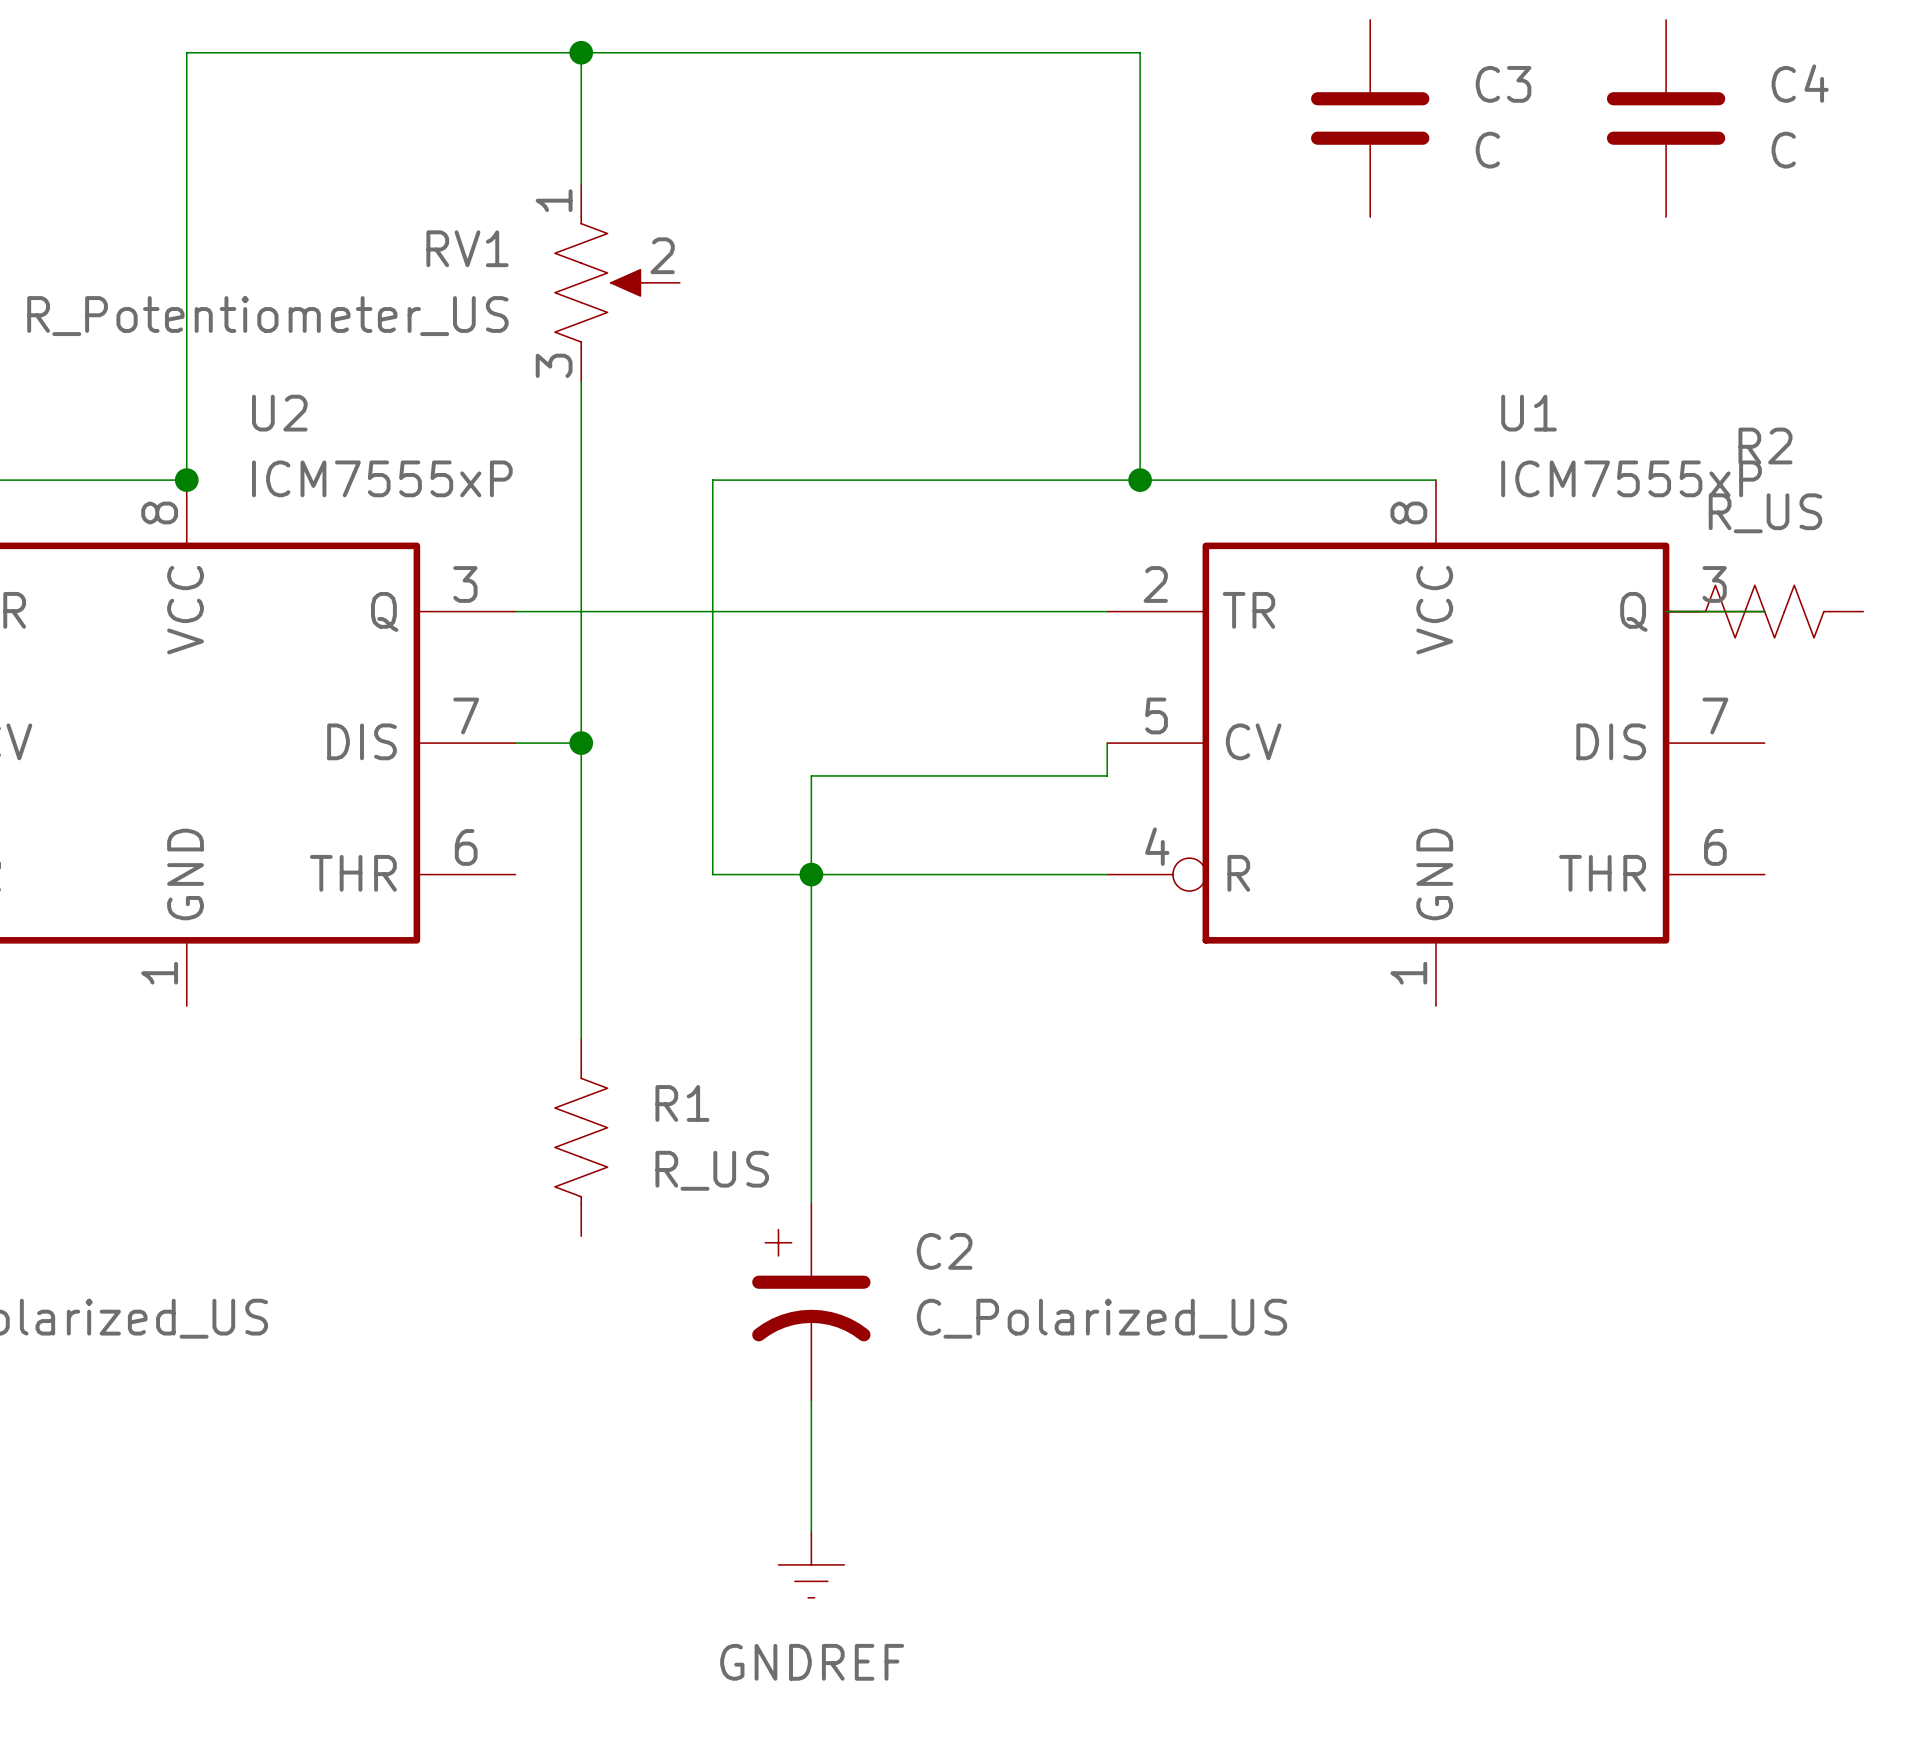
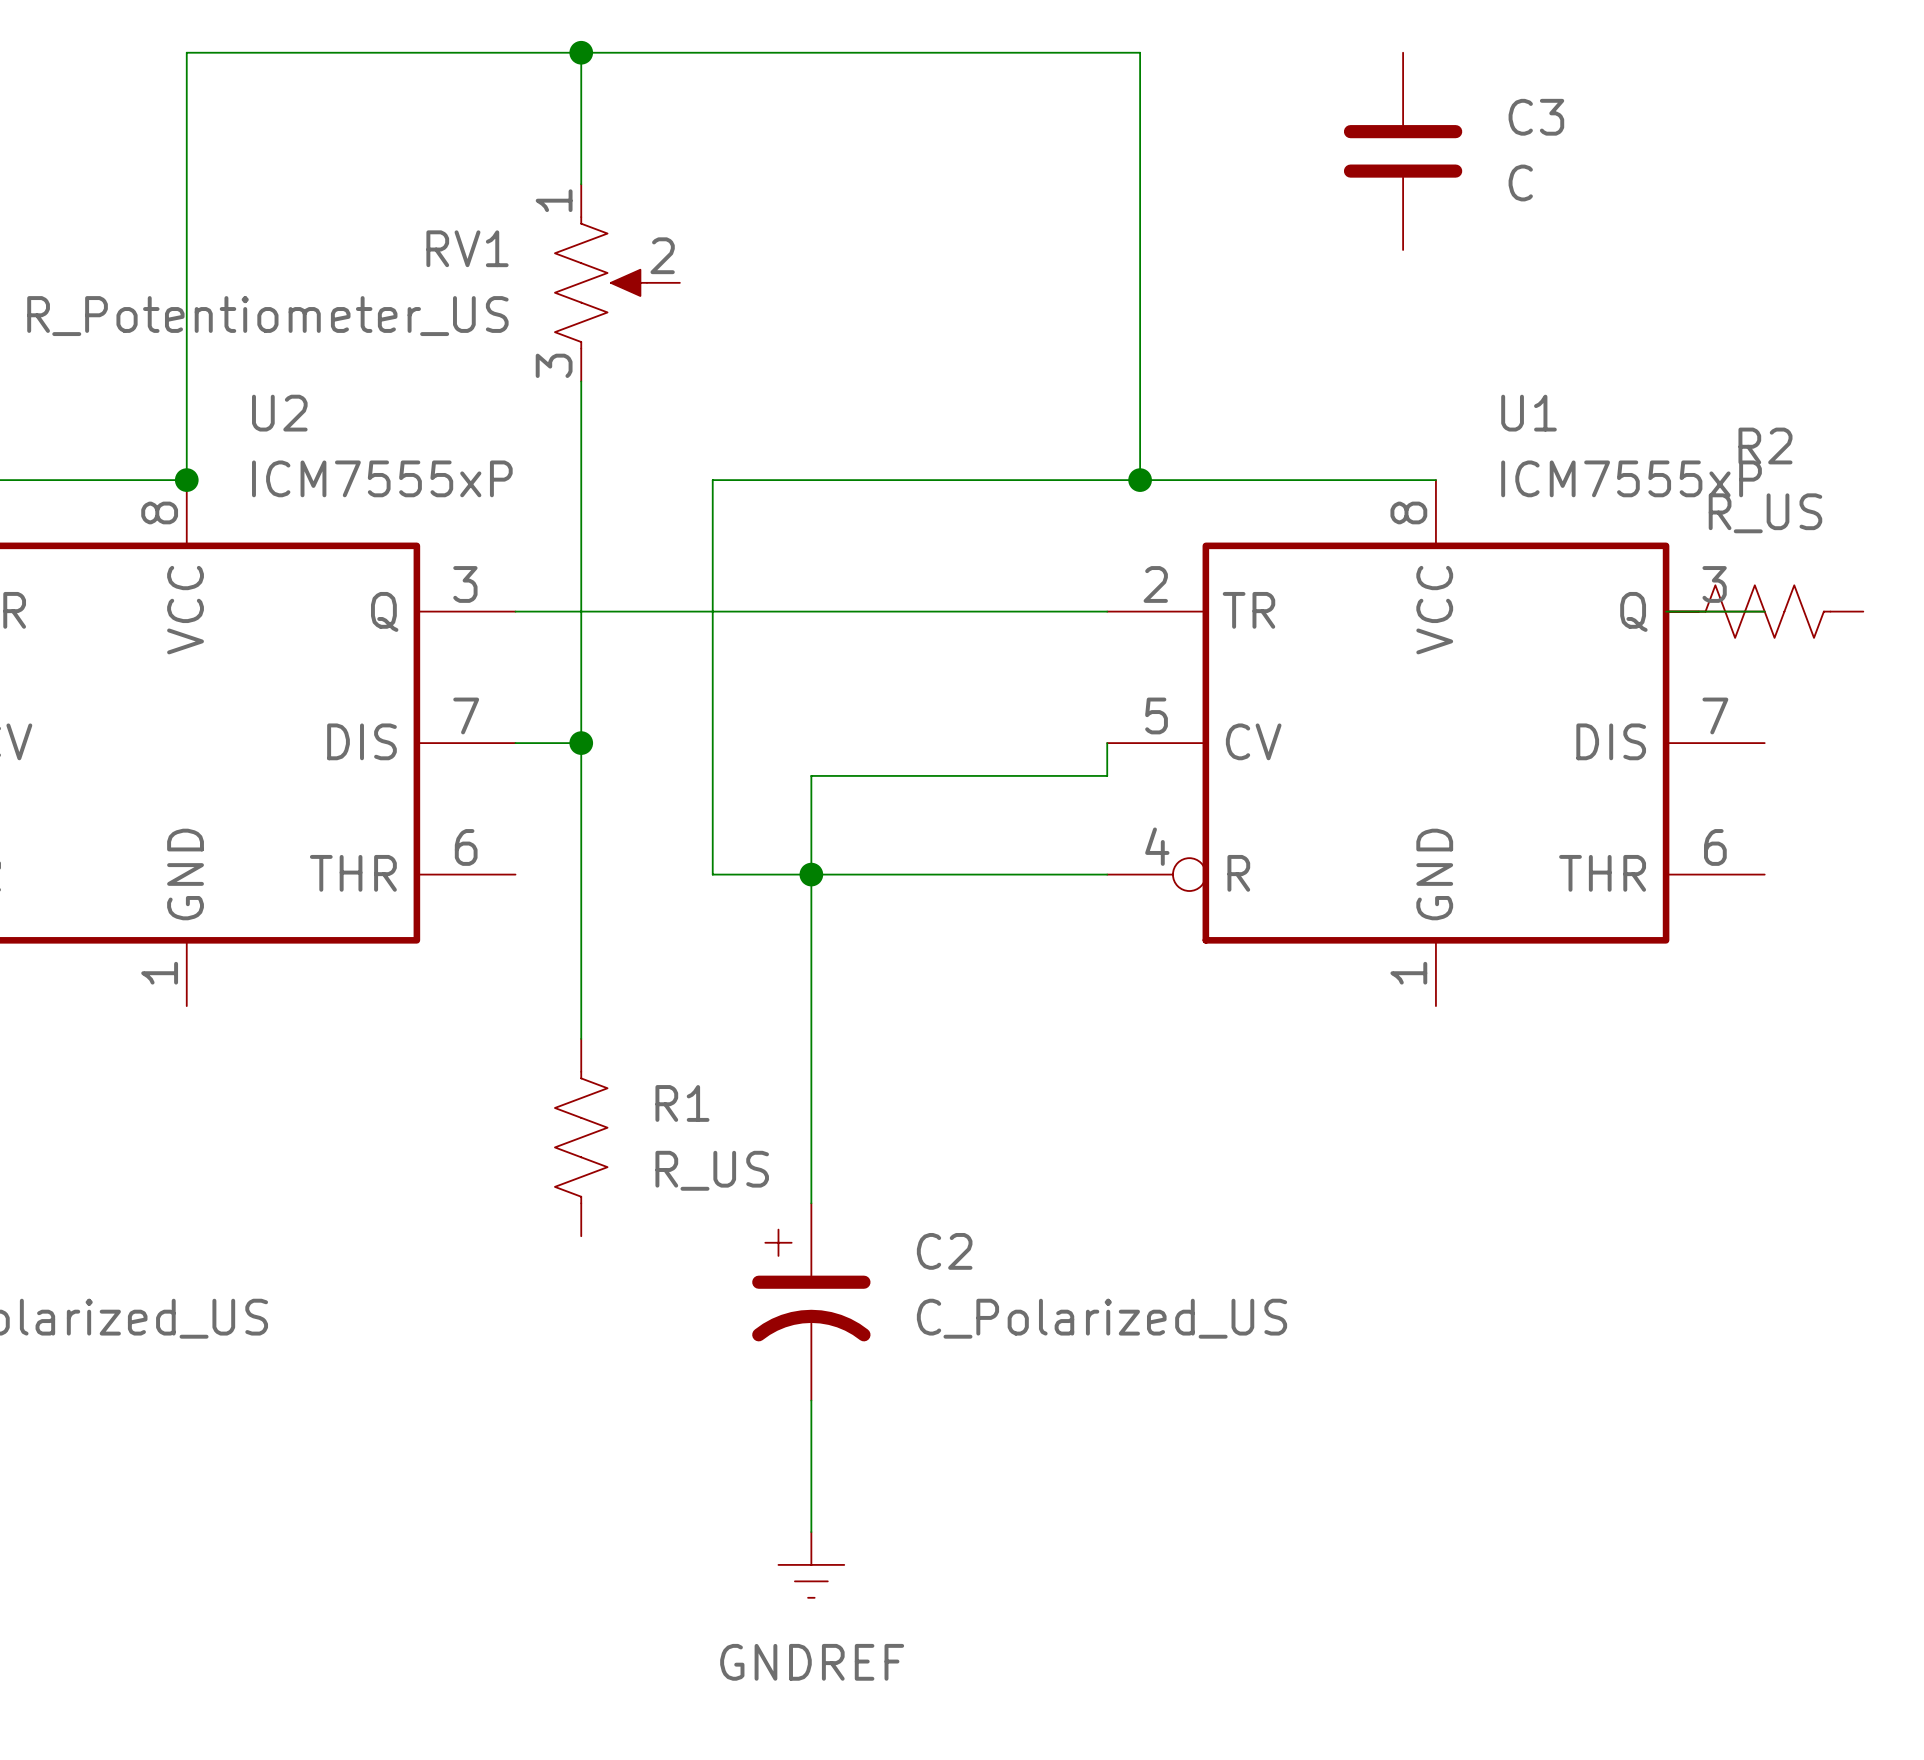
C3 position: (1370, 118) -> (1403, 151)
C4: C (1666, 118) -> none

